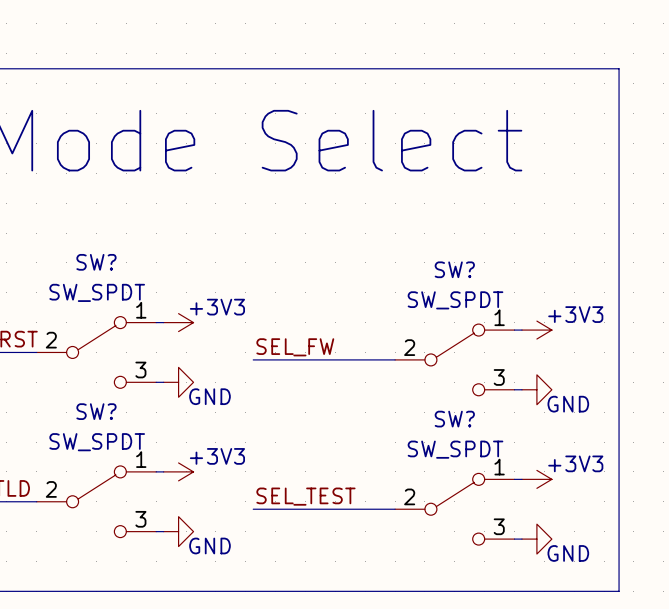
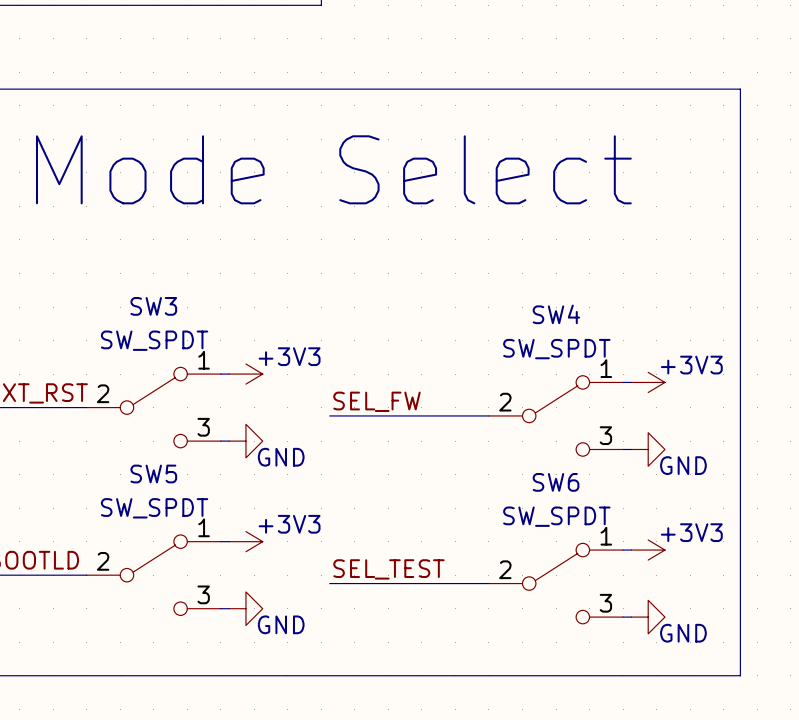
SW? name: SW? (96, 262) -> SW3 (153, 306)
SW? name: SW? (454, 269) -> SW4 (556, 314)
SW? name: SW? (96, 411) -> SW5 (153, 473)
SW? name: SW? (454, 419) -> SW6 (556, 482)

